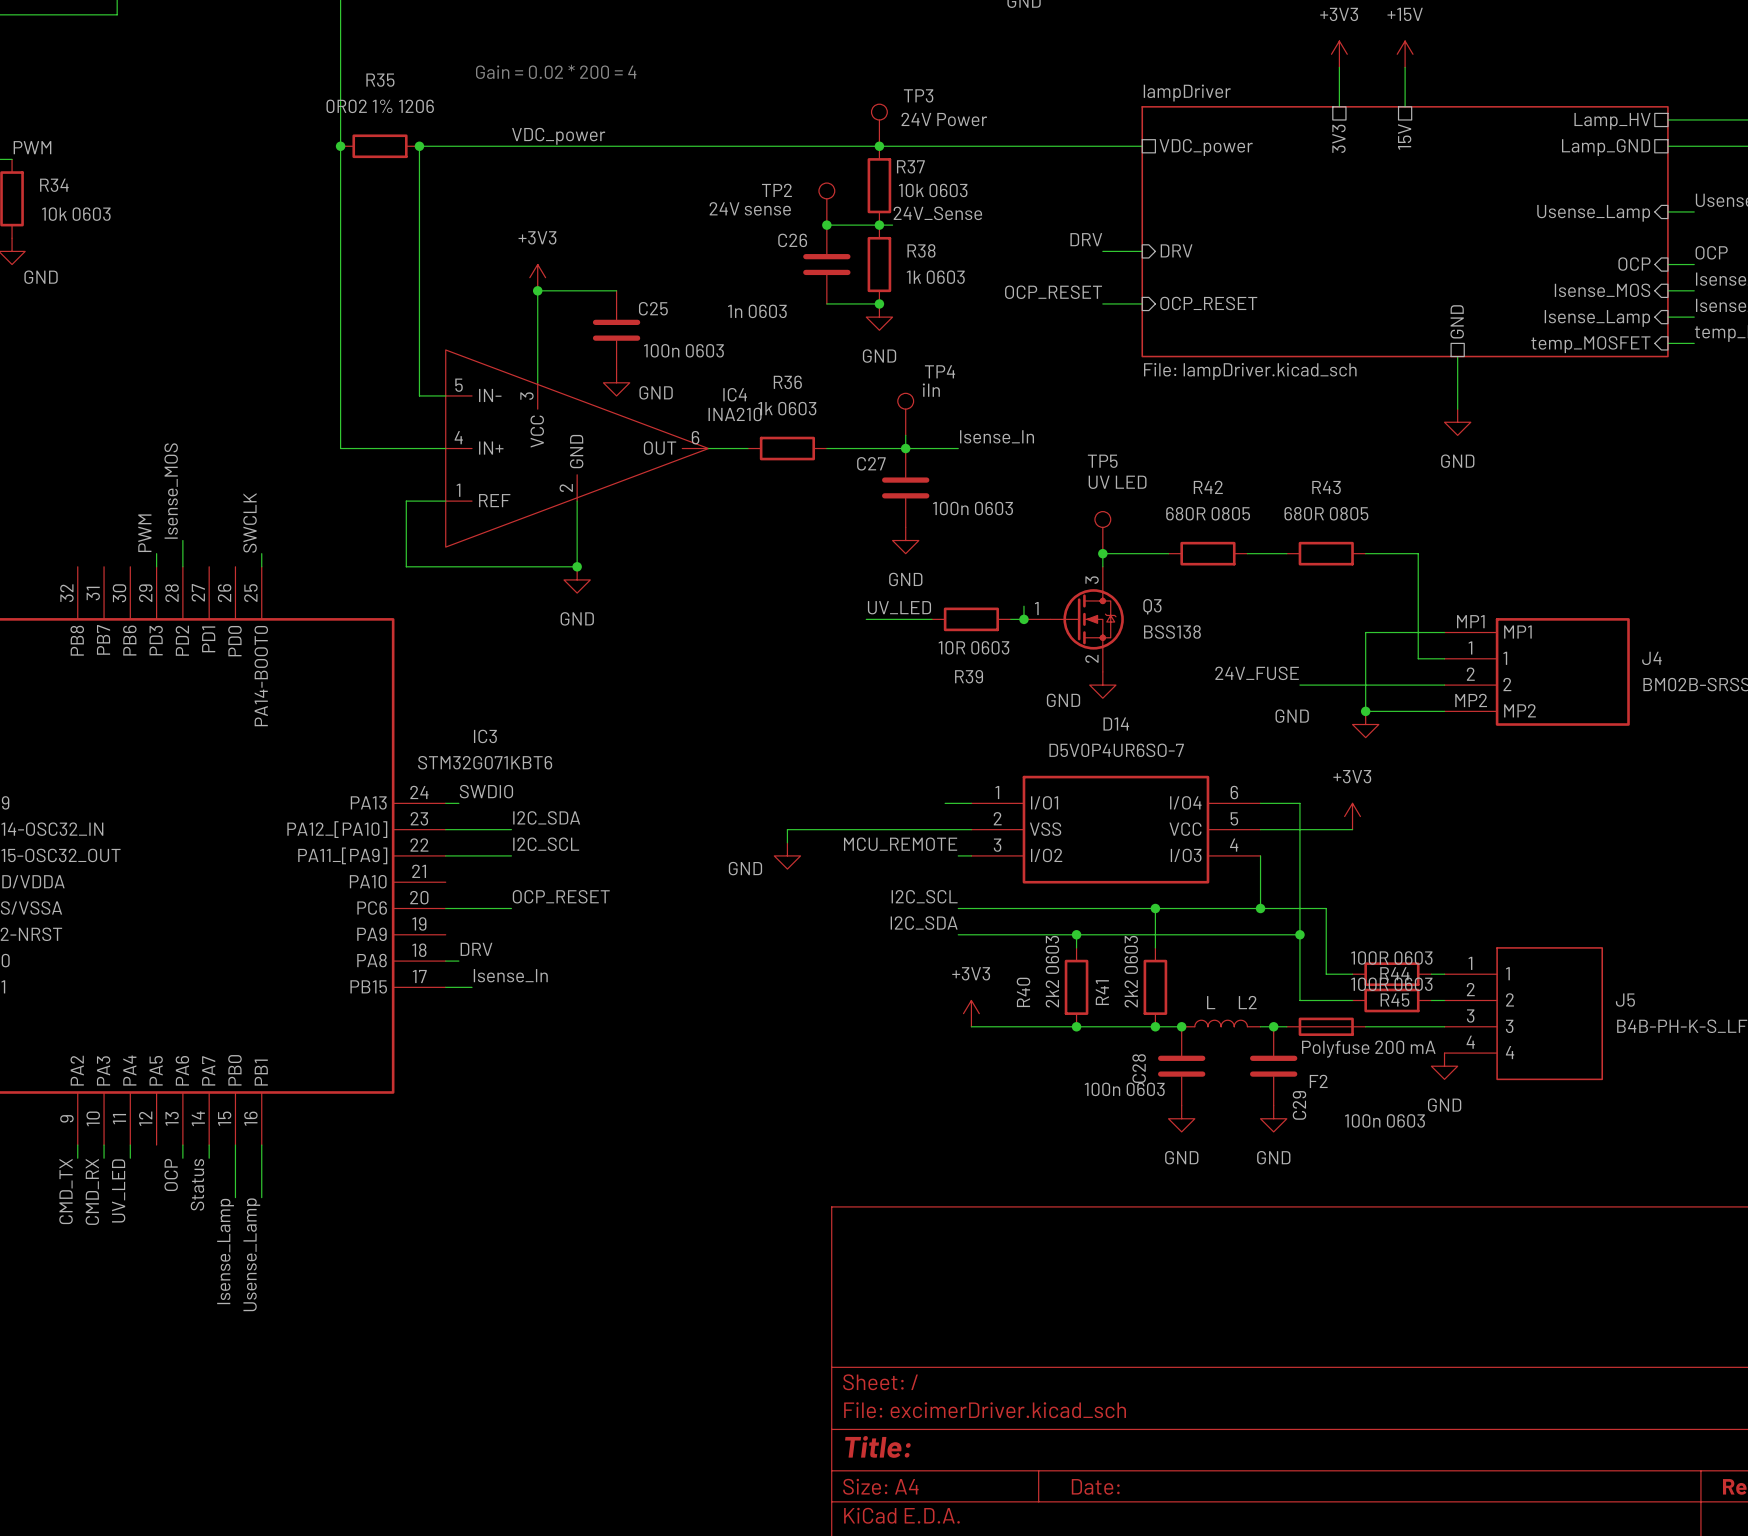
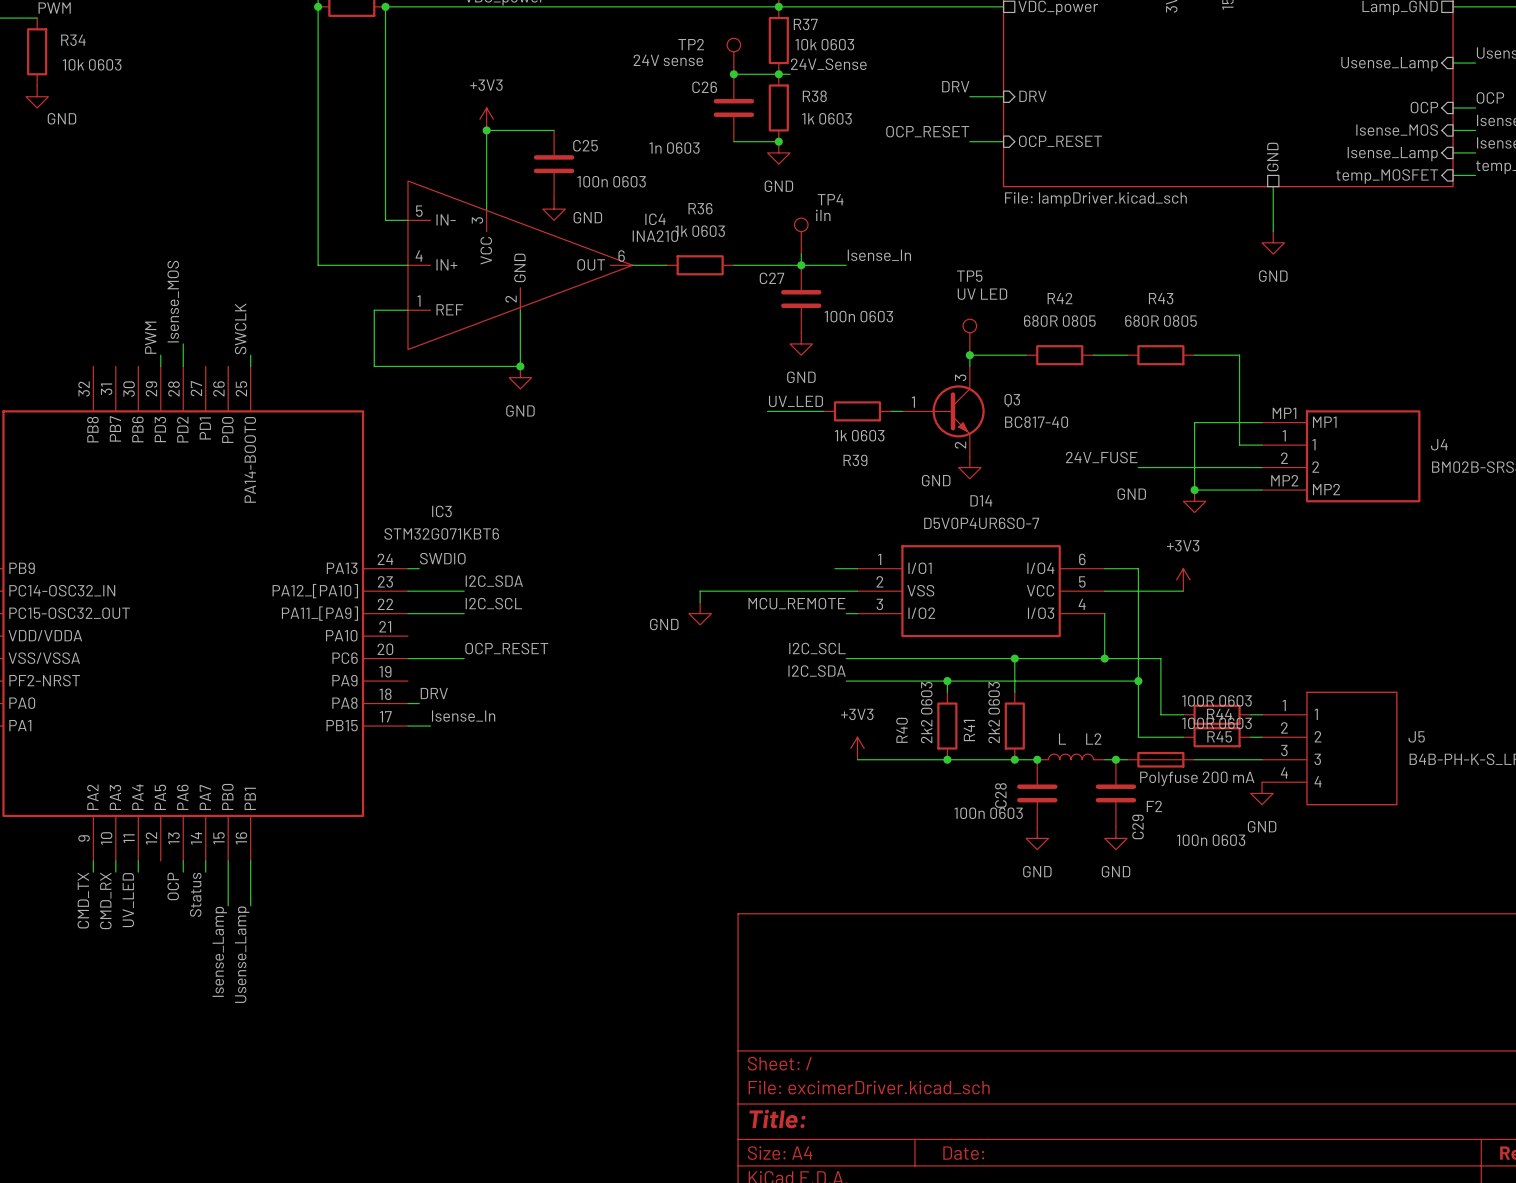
Q3 symbol: [1023, 566, 1124, 672] -> [902, 366, 985, 457]
wire: (1023, 606) (1023, 619) -> none
junction: (1023, 619) -> none
Q3 value: BSS138 (1172, 632) -> BC817-40 (1036, 422)
R39 value: 10R 0603 (973, 647) -> 1k 0603 (859, 435)

